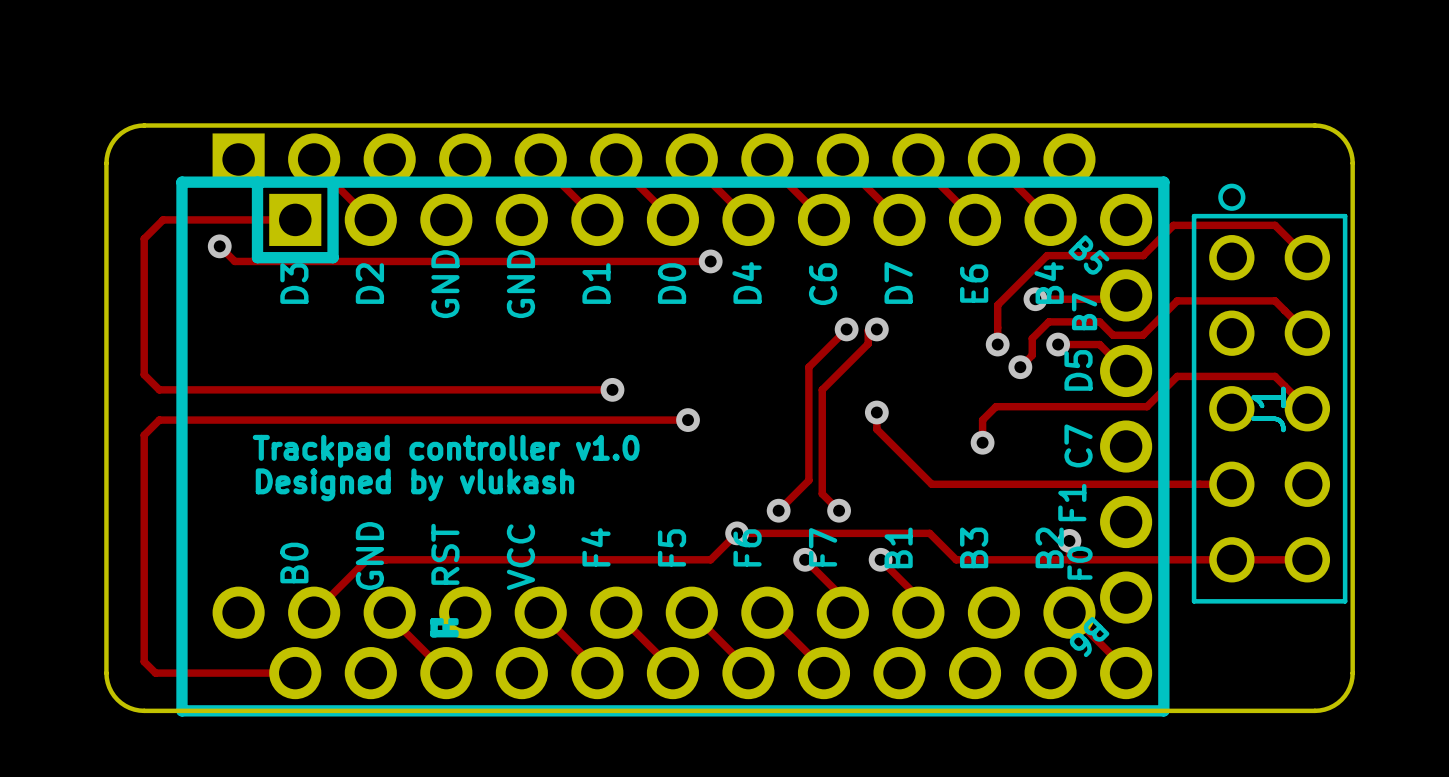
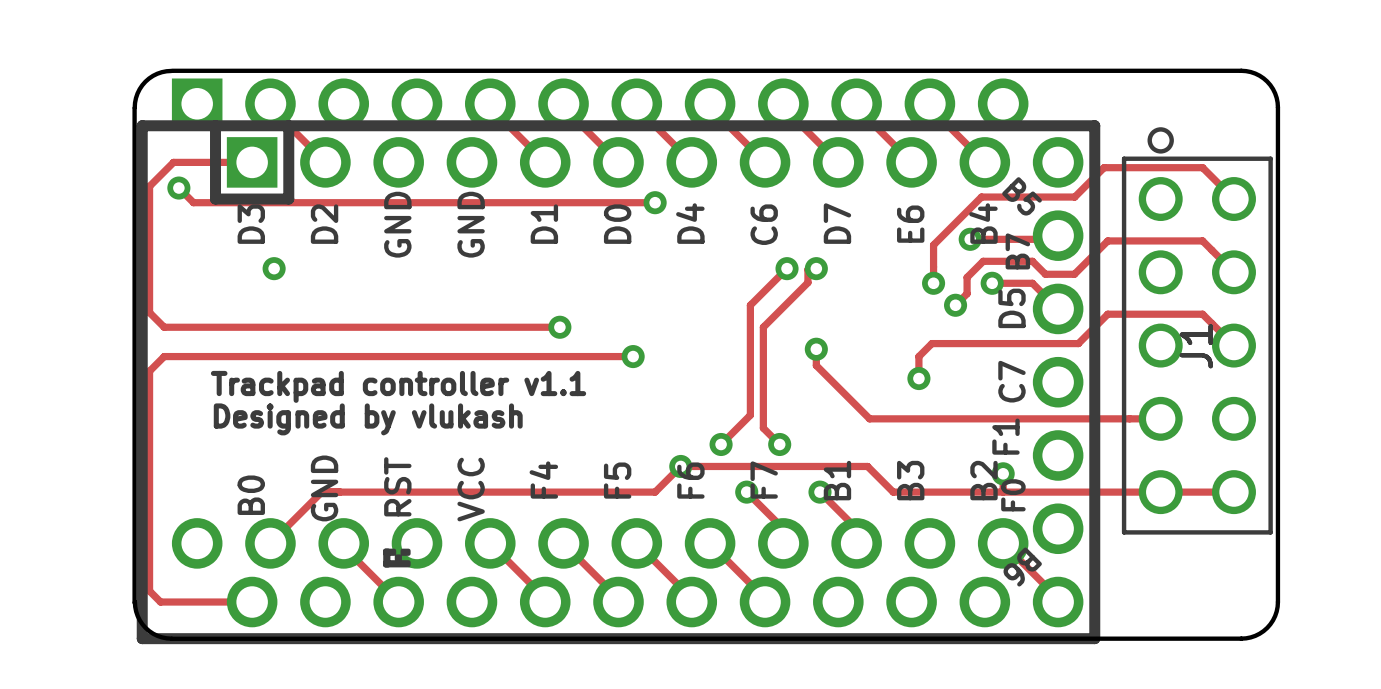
board edge: (212, 125) (134, 126) (125, 130) (114, 140) (106, 158) (106, 673) (111, 691) (125, 705) (144, 710) (1314, 710) -> (171, 638) (1241, 638)
board edge: none -> (171, 70) (157, 73) (145, 81) (137, 93) (134, 107)
board edge: none -> (134, 108) (134, 602)
track: (214, 219) (163, 219) (144, 238) (144, 374) (159, 389) (204, 389) -> (173, 162) (149, 186) (149, 312) (164, 327)
via: none -> (274, 268)
track: (204, 420) (159, 420) (144, 435) (144, 661) (155, 673) (200, 673) -> (164, 356) (149, 371) (149, 591) (160, 602)
text: Trackpad controller v1.0 (446, 451) -> Trackpad controller v1.1 (398, 386)
board edge: none -> (134, 602) (137, 616) (145, 627) (157, 635) (171, 638)

